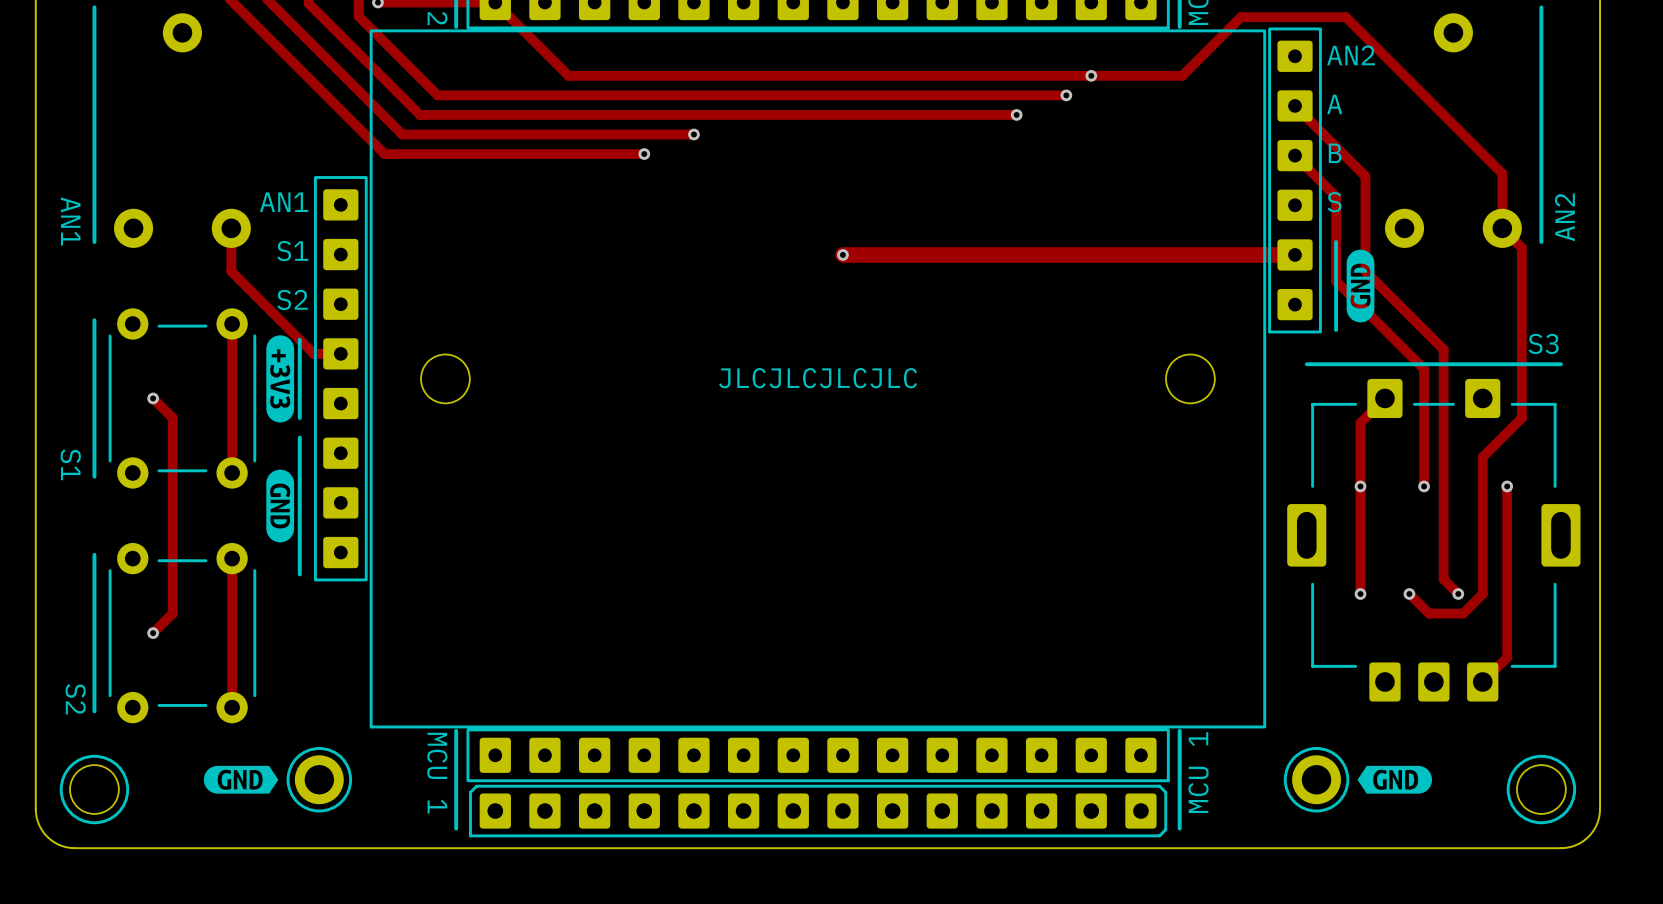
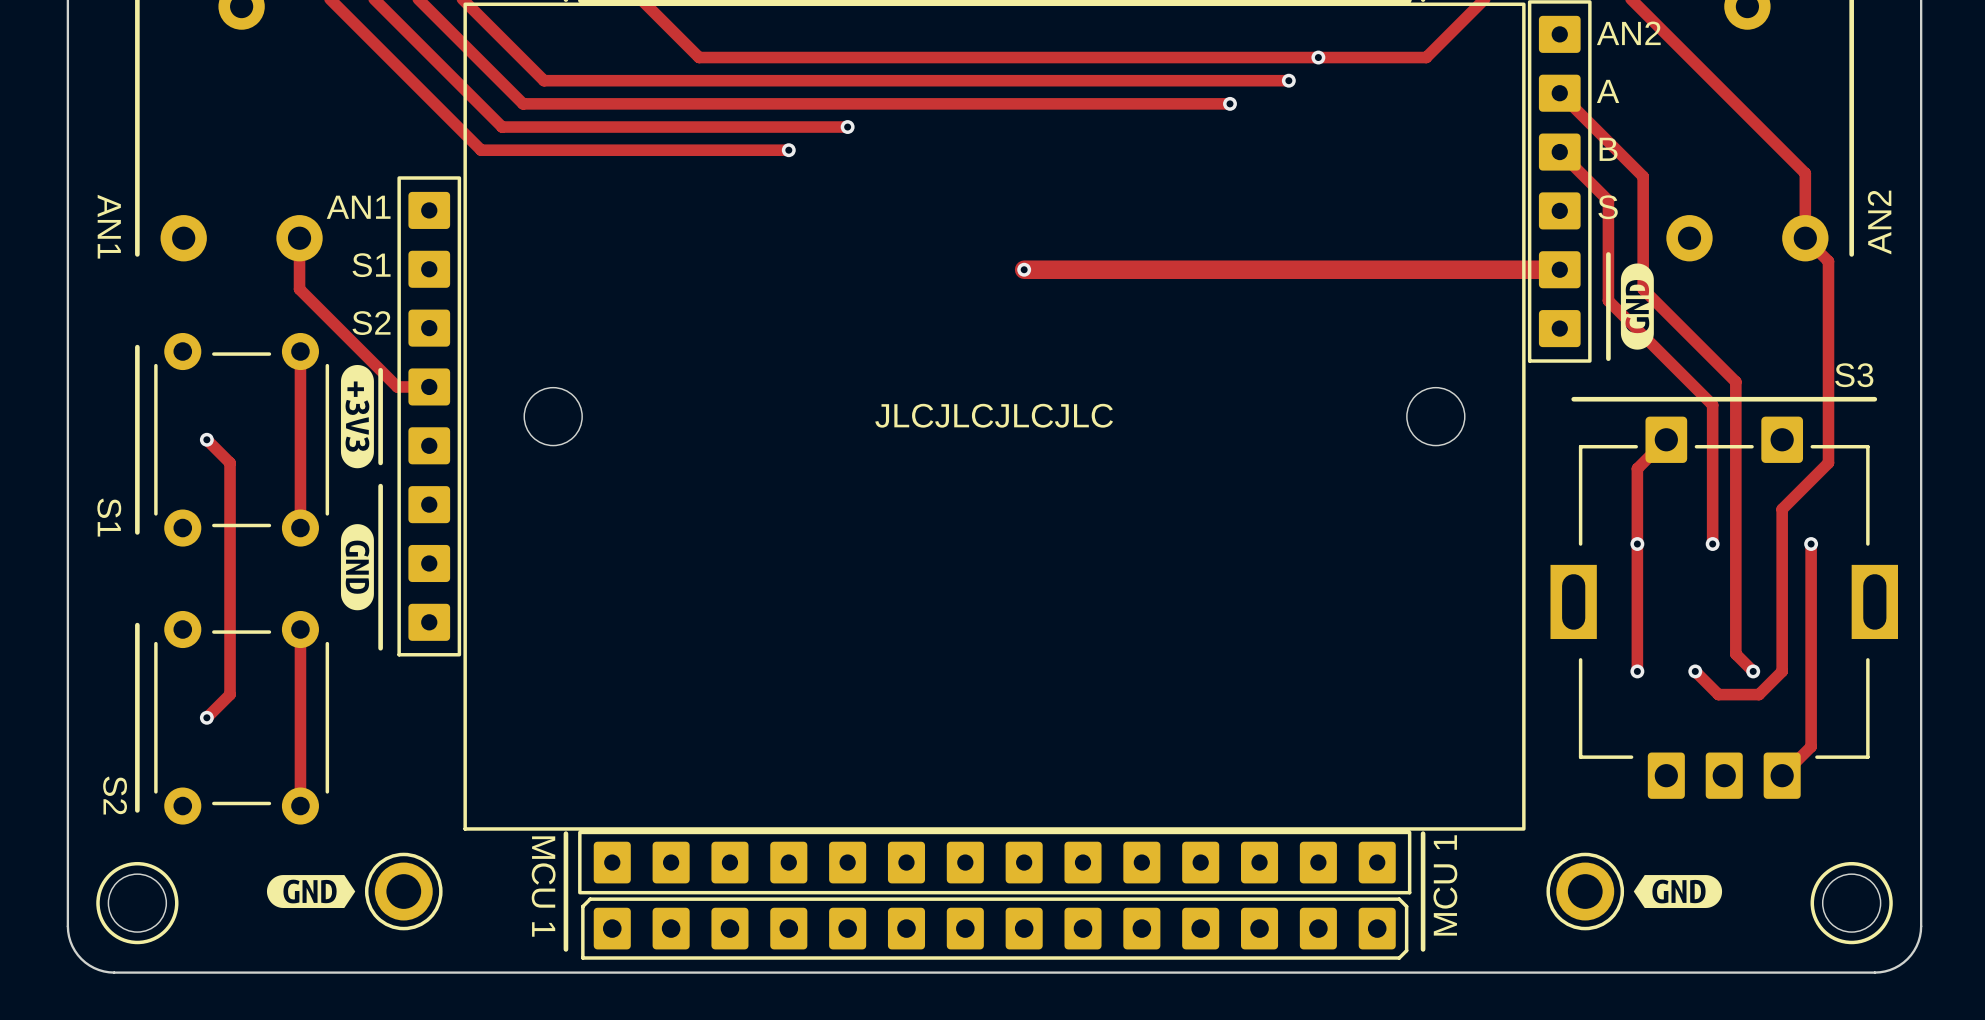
part footprint: [1287, 378, 1581, 702] -> [1550, 416, 1898, 799]

